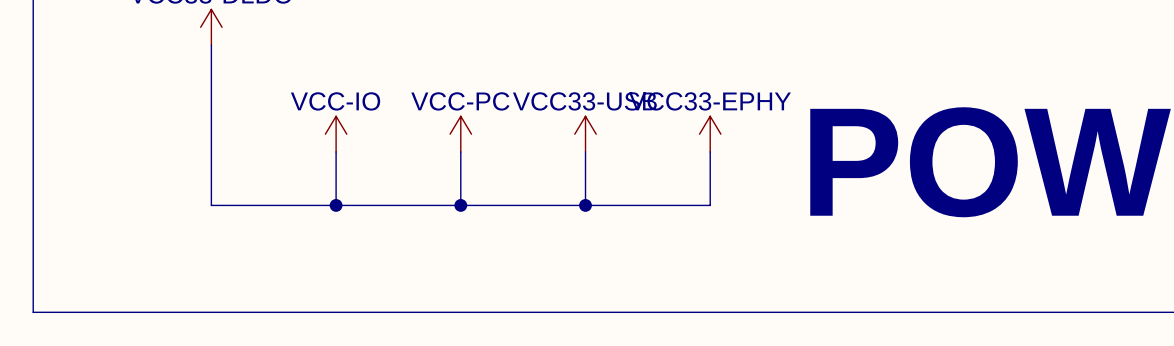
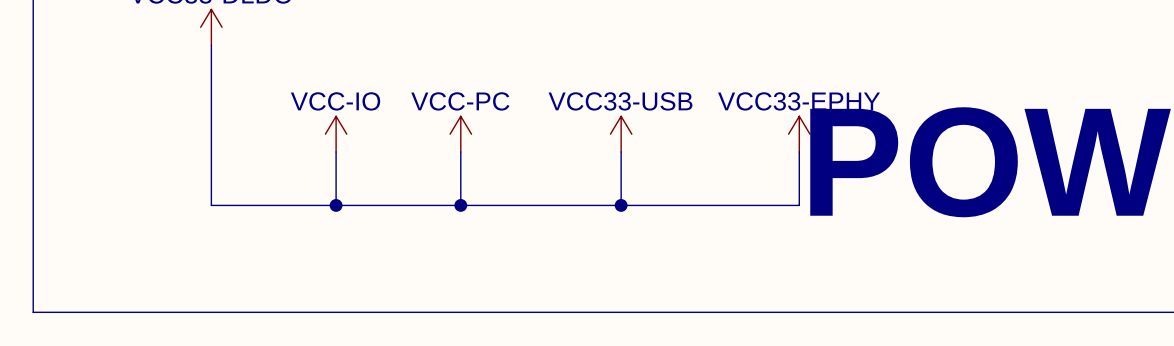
power symbol position: VCC33-USB (585, 134) -> VCC33-USB (621, 134)
power symbol position: VCC33-EPHY (710, 134) -> VCC33-EPHY (799, 134)
wire: (585, 151) (585, 205) -> (621, 151) (621, 205)
wire: (710, 151) (710, 205) -> (799, 151) (799, 205) (710, 205)
junction position: (585, 205) -> (621, 205)

